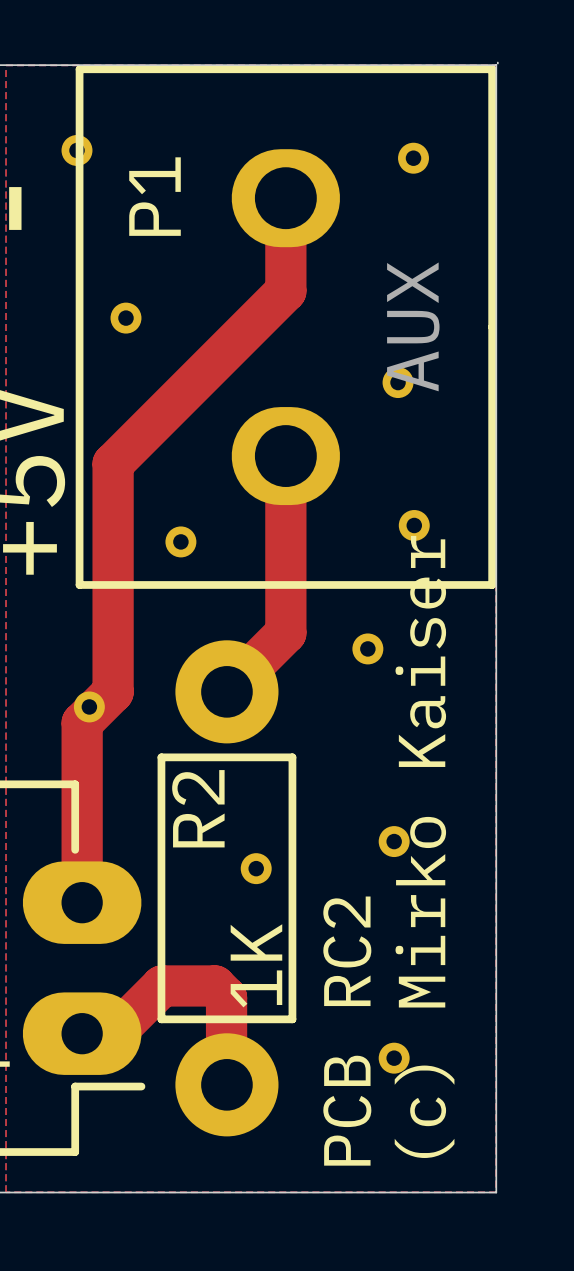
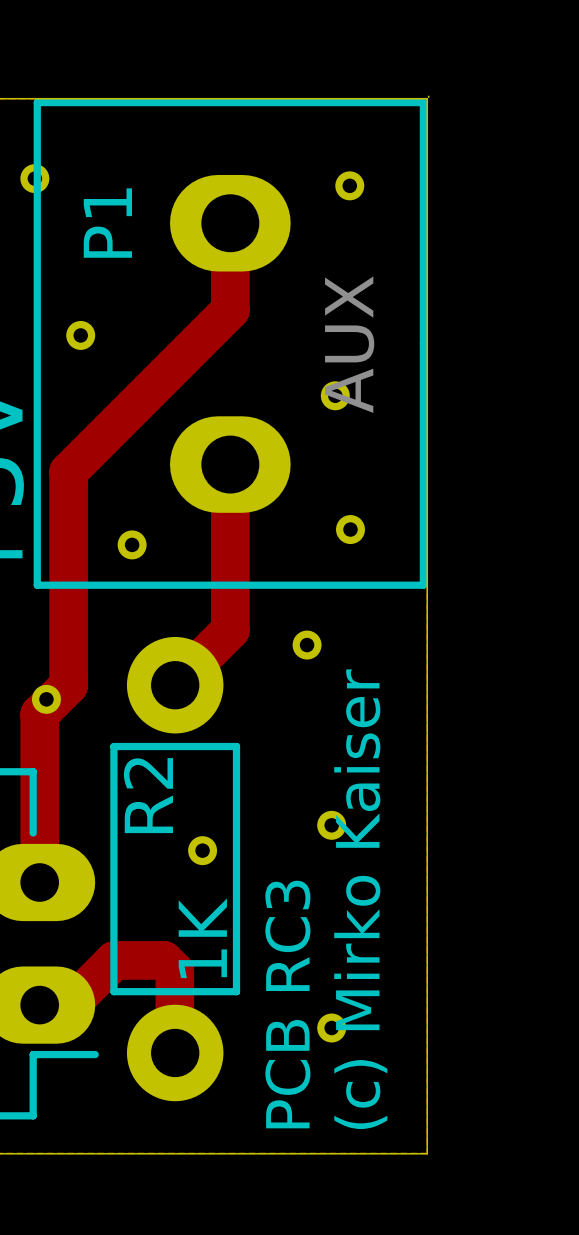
P1 footprint: [75, 65, 497, 589] -> [33, 98, 428, 589]
text: PCB RC2 (347, 1031) -> PCB RC3 (287, 1004)

